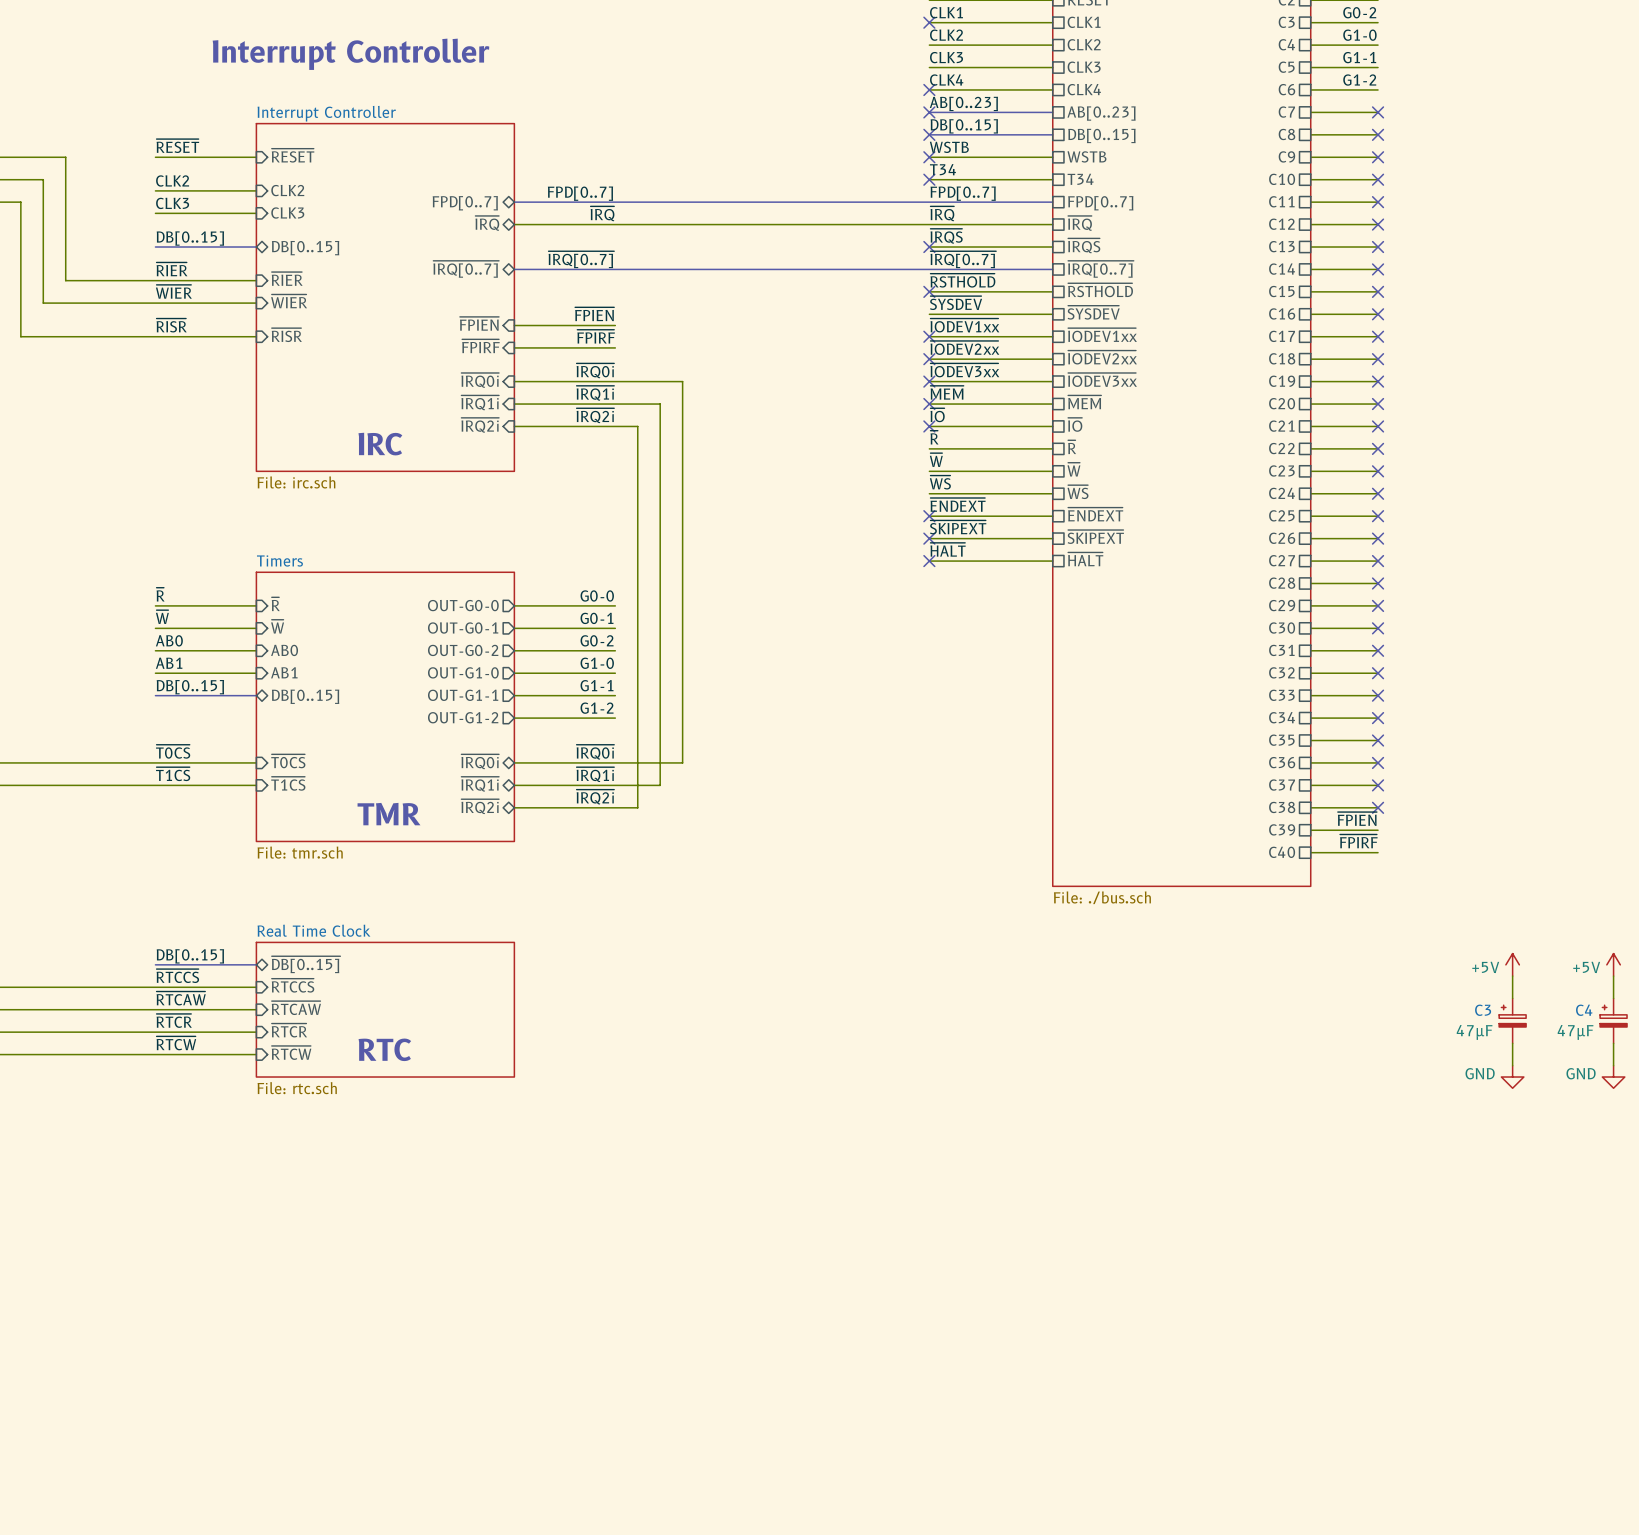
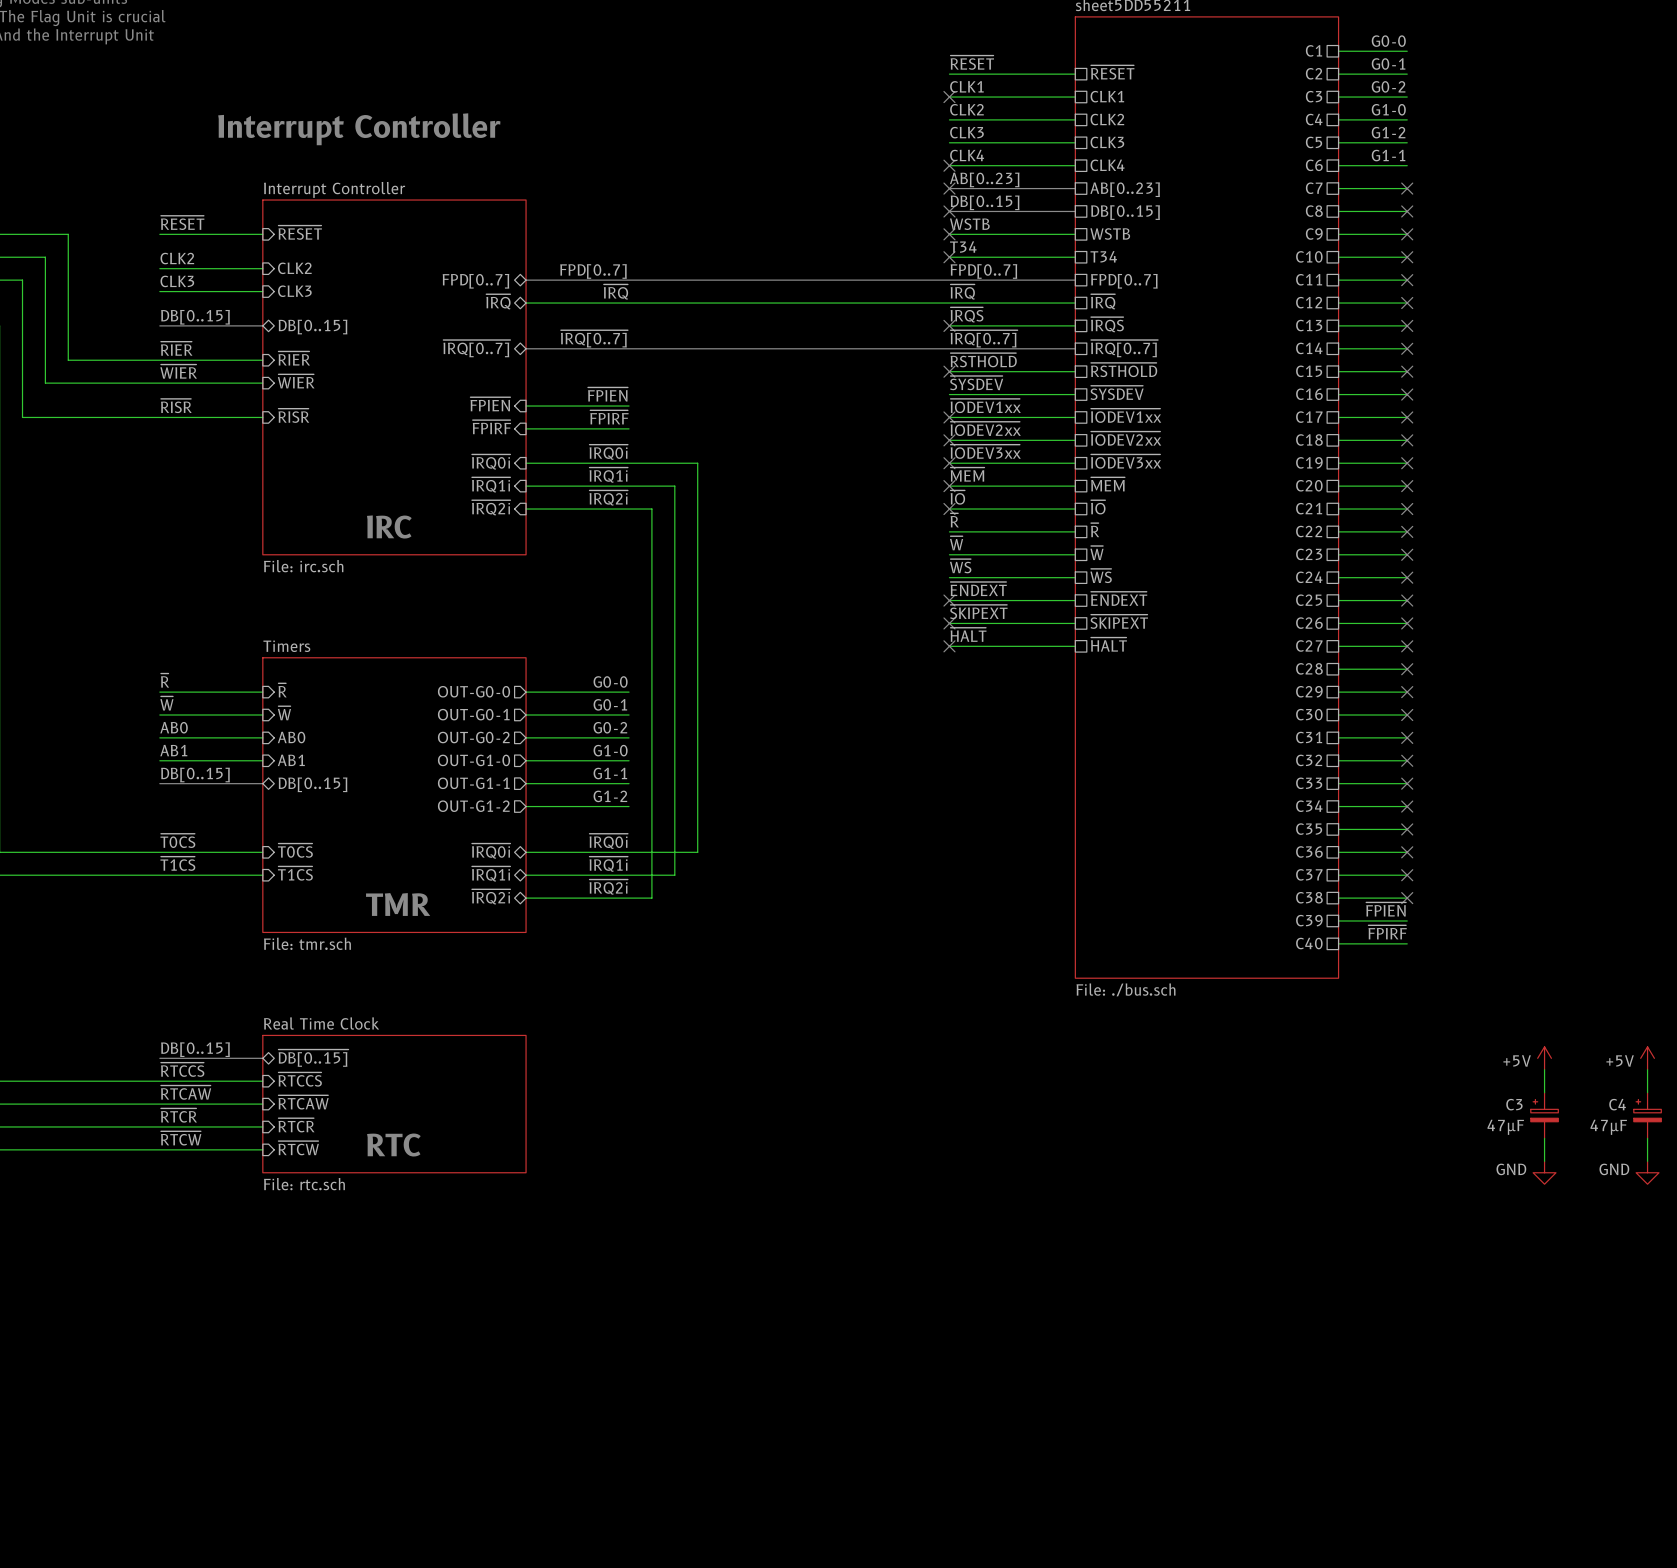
label: G1-1 (1359, 57) -> G1-2 (1388, 132)
label: G1-2 (1359, 80) -> G1-1 (1388, 155)

